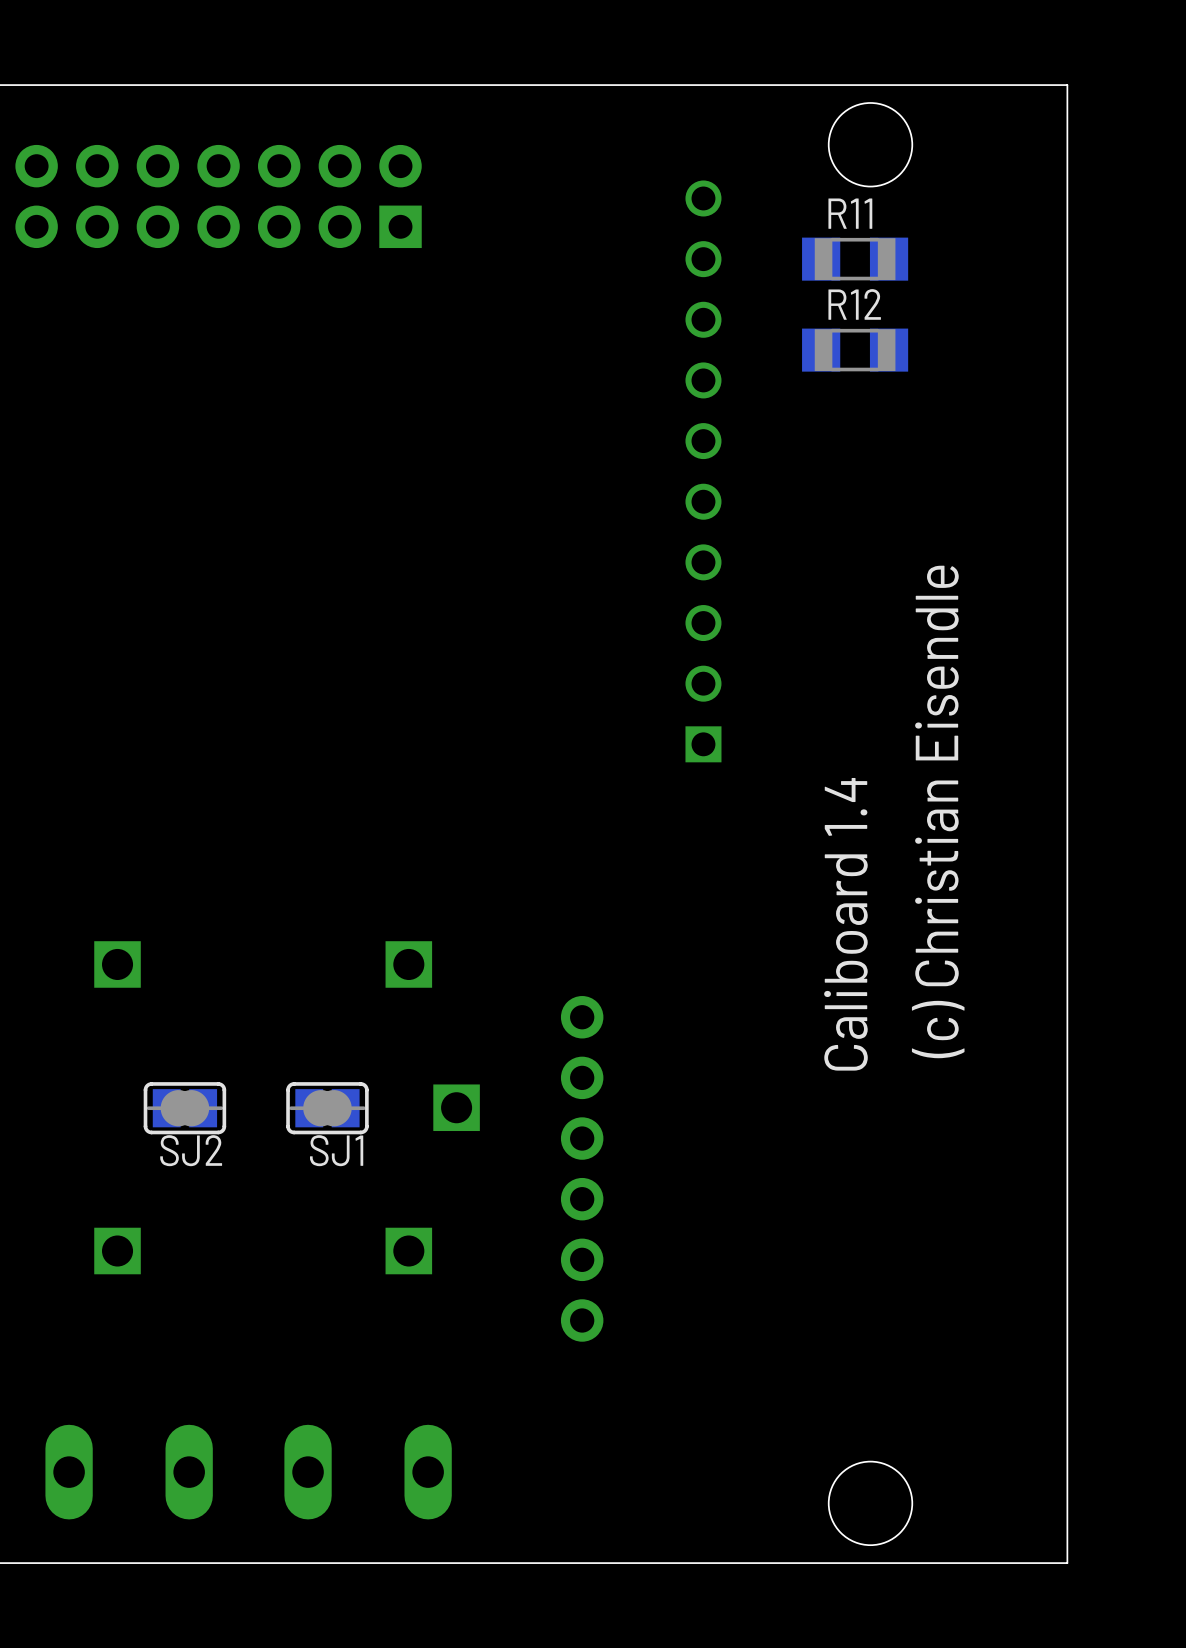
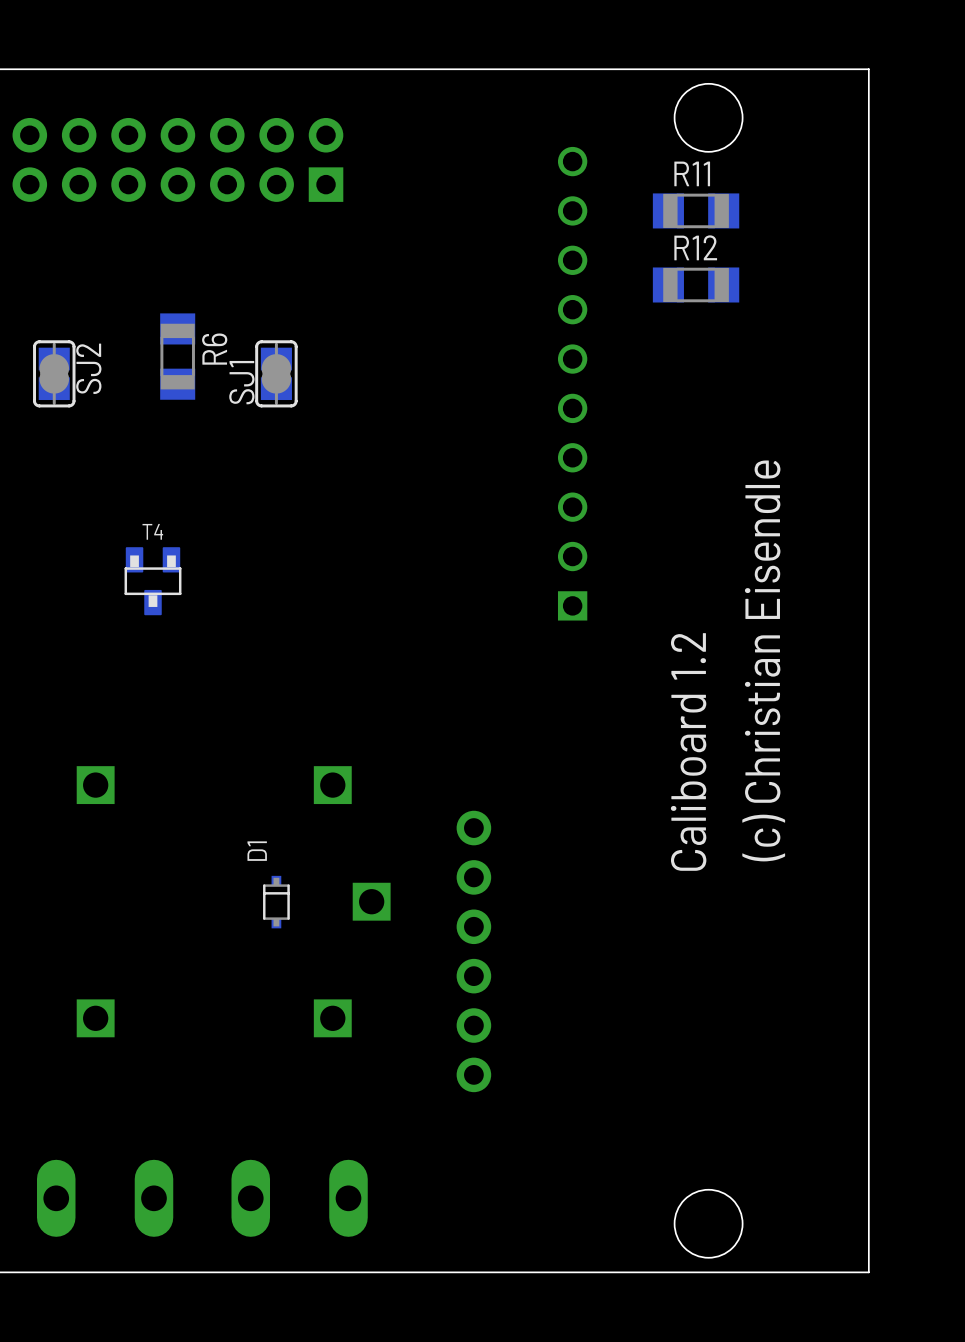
R6: none -> (177, 356)
T4: none -> (153, 581)
text: Caliboard 1.4 (845, 924) -> Caliboard 1.2 (688, 751)
SJ2 rotation: 0° (184, 1108) -> 90° clockwise (54, 373)
SJ2 position: (184, 1108) -> (54, 373)
SJ1 rotation: 0° (327, 1108) -> 90° clockwise (276, 373)
SJ1 position: (327, 1108) -> (276, 373)
D1: none -> (276, 902)
SJ2 name position: SJ2 (191, 1150) -> SJ2 (88, 368)

